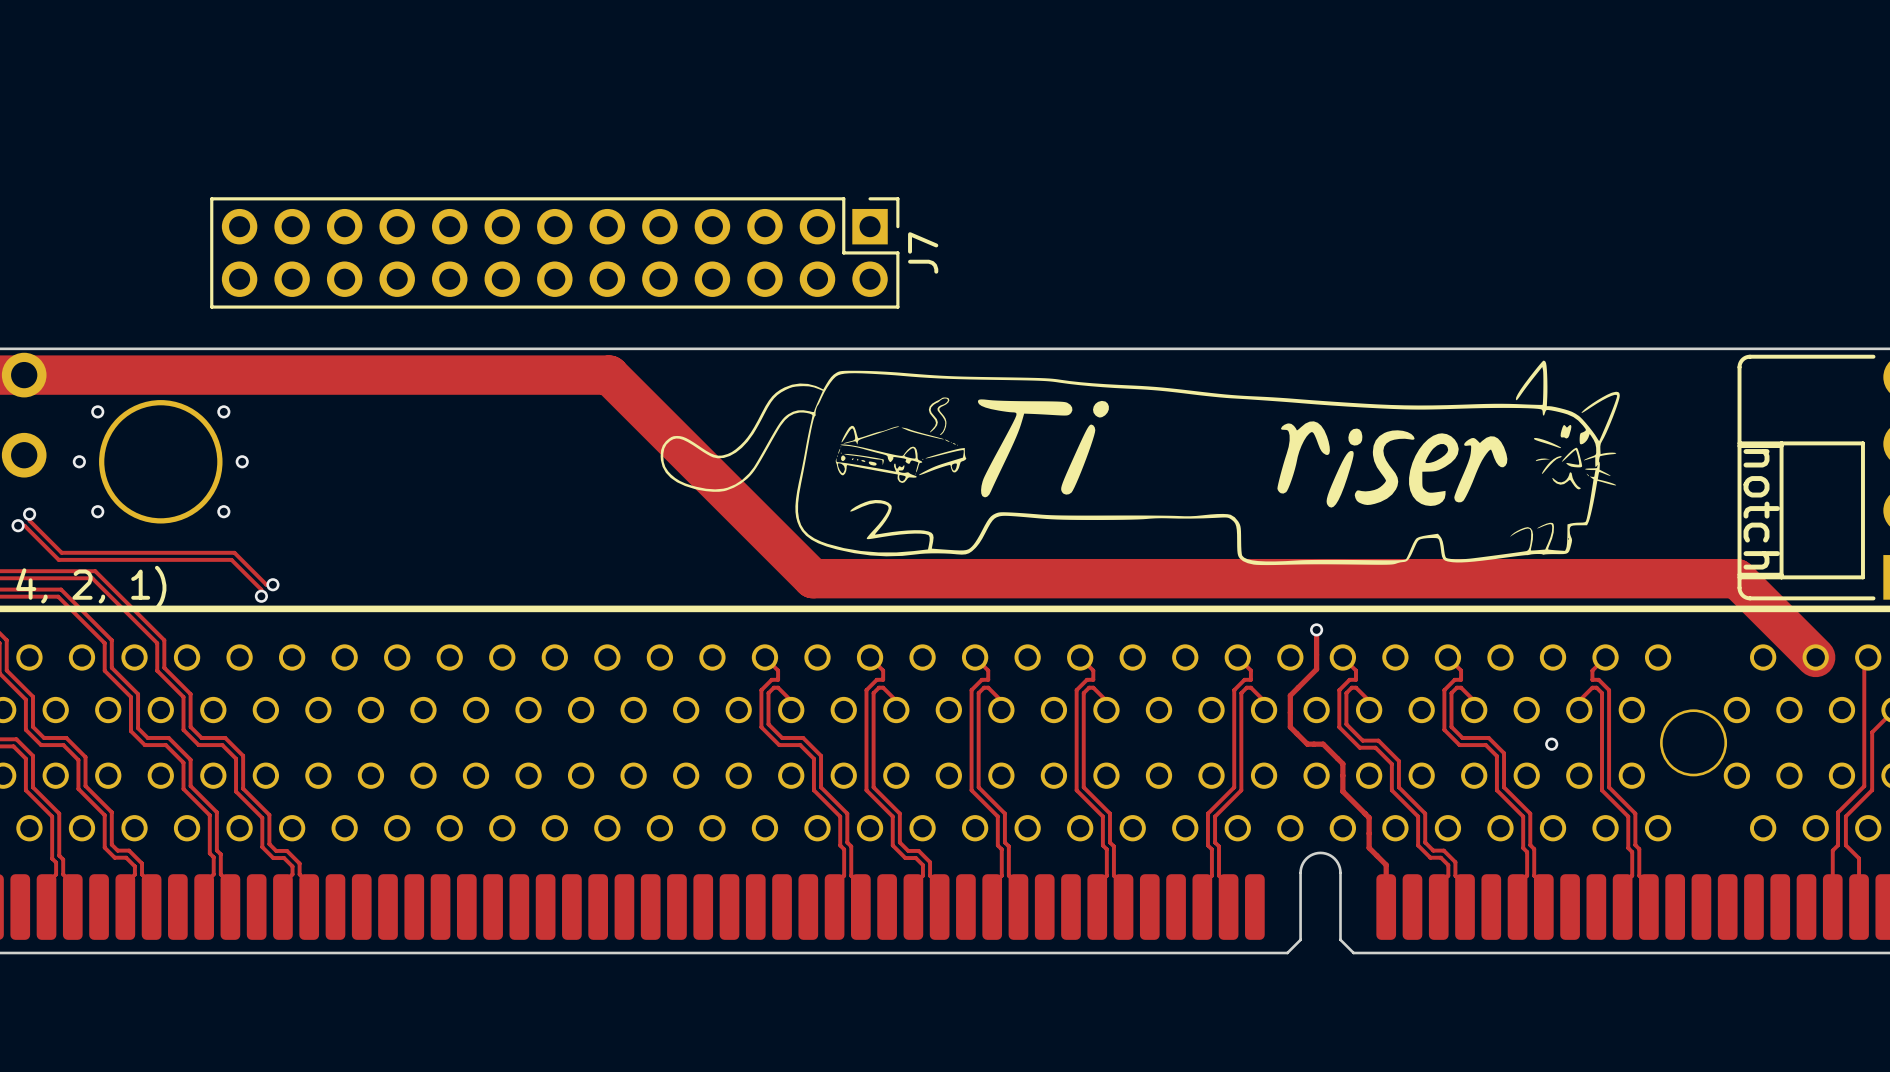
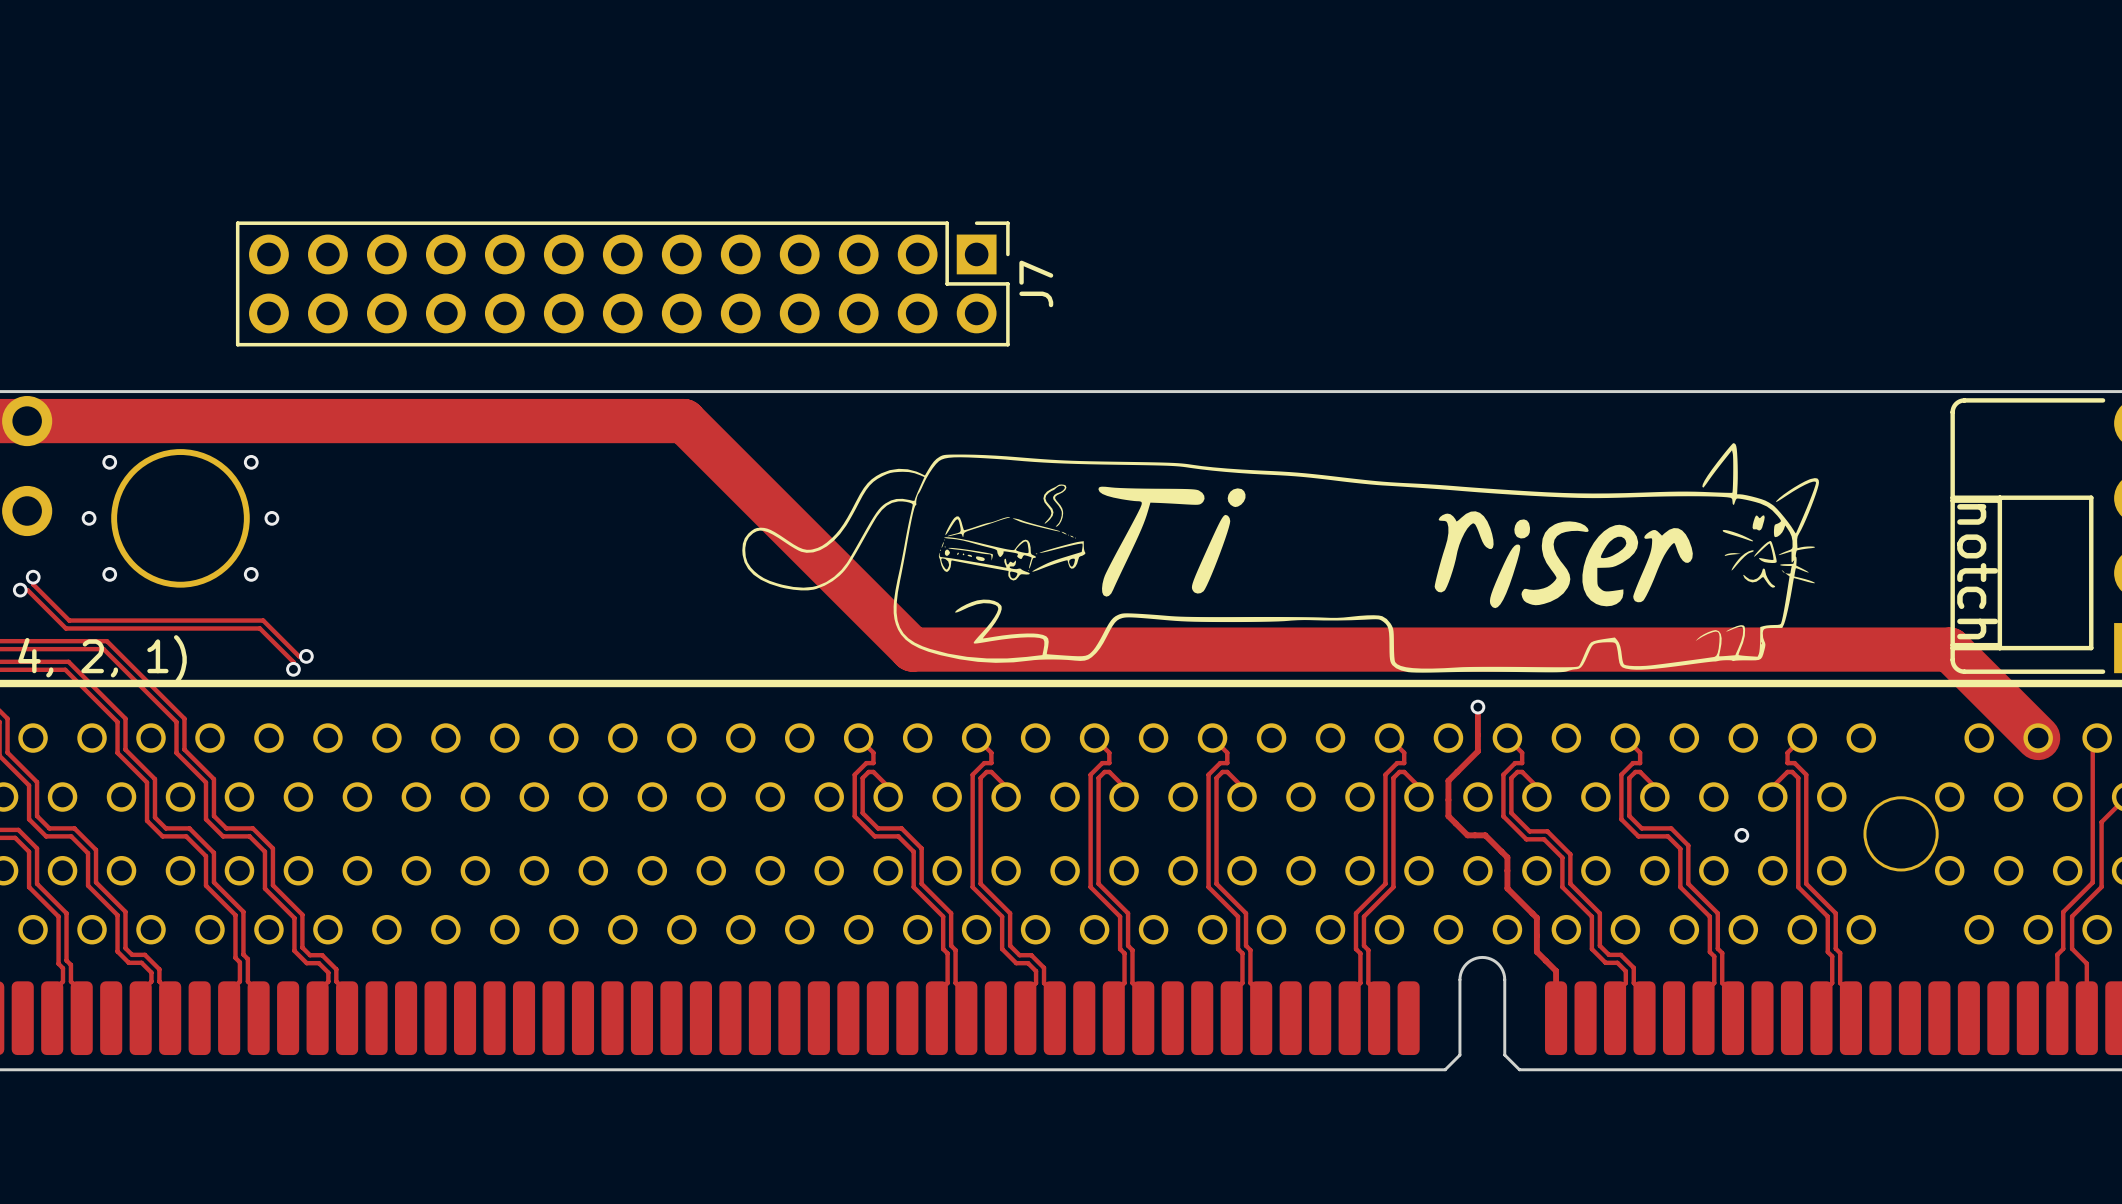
drawing position: (1140, 462) -> (1280, 557)

